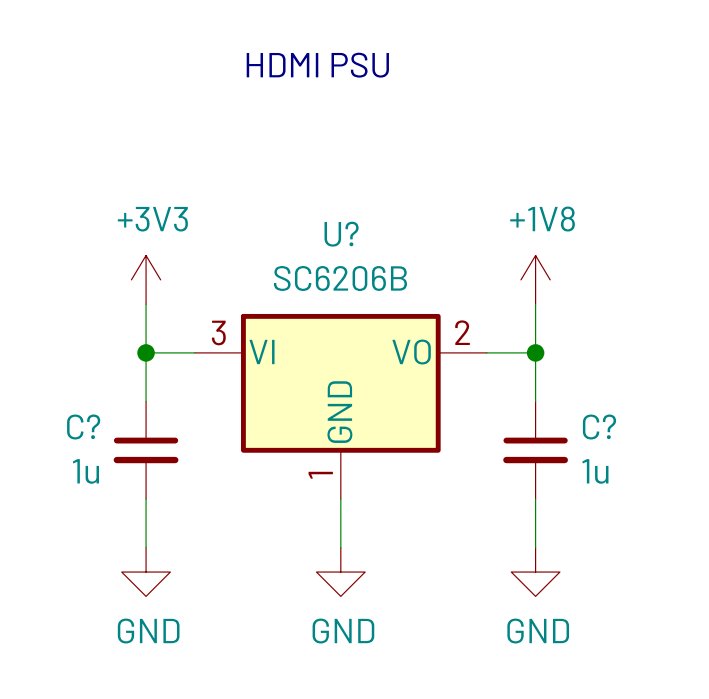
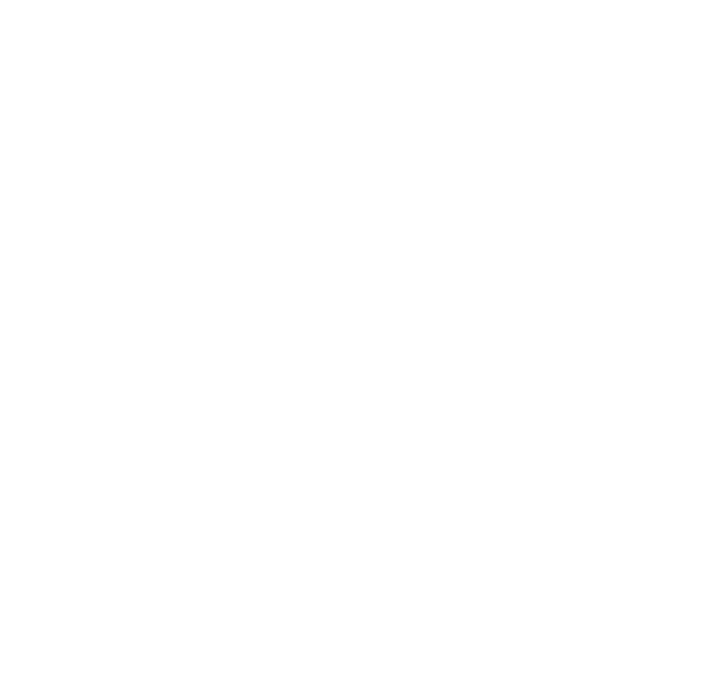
text: HDMI PSU (317, 65) -> none
power symbol: +3V3 (146, 279) -> none
power symbol: +1V8 (535, 279) -> none
wire: (146, 304) (146, 401) -> none
wire: (535, 304) (535, 401) -> none
wire: (146, 352) (194, 352) -> none
junction: (146, 352) -> none
wire: (486, 352) (535, 352) -> none
junction: (535, 352) -> none
U?: SC6206B (340, 406) -> none
C?: 1u (146, 450) -> none
C?: 1u (535, 450) -> none
wire: (146, 498) (146, 547) -> none
wire: (340, 498) (340, 547) -> none
wire: (535, 498) (535, 547) -> none
power symbol: GND (146, 572) -> none
power symbol: GND (340, 572) -> none
power symbol: GND (535, 572) -> none

